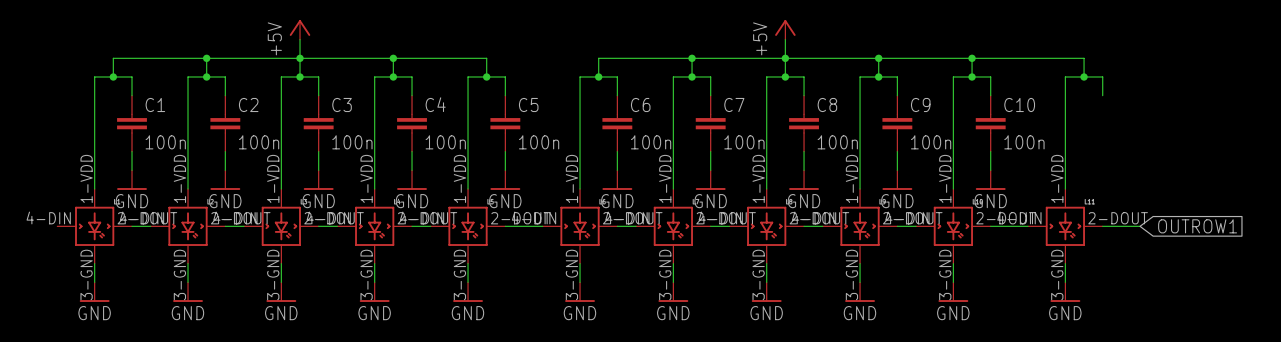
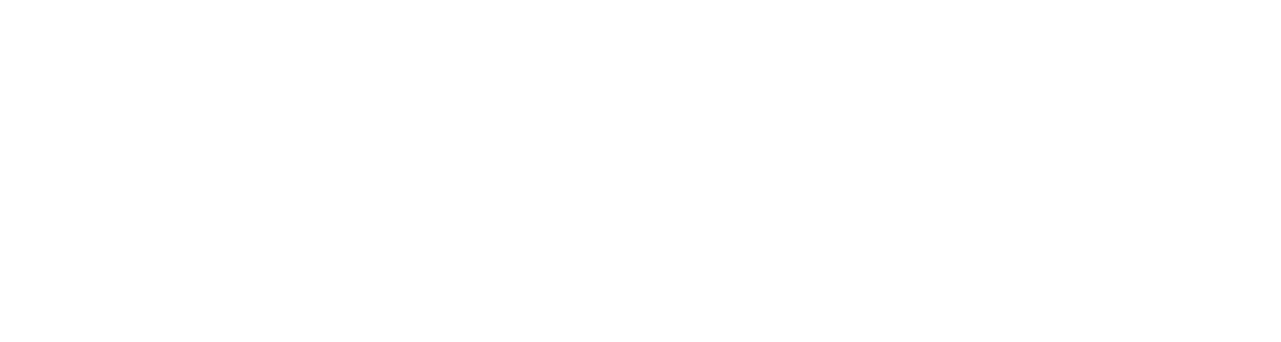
power symbol: +5V (300, 29) -> none
power symbol: +5V (785, 29) -> none
wire: (300, 39) (300, 76) -> none
wire: (785, 39) (785, 76) -> none
wire: (206, 58) (206, 76) -> none
junction: (206, 58) -> none
junction: (300, 58) -> none
wire: (393, 58) (393, 76) -> none
junction: (393, 58) -> none
wire: (692, 58) (692, 76) -> none
junction: (692, 58) -> none
junction: (785, 58) -> none
wire: (878, 58) (878, 76) -> none
junction: (878, 58) -> none
wire: (972, 58) (972, 76) -> none
junction: (972, 58) -> none
wire: (113, 76) (113, 58) (486, 58) (486, 76) -> none
junction: (113, 76) -> none
junction: (206, 76) -> none
junction: (300, 76) -> none
junction: (393, 76) -> none
junction: (486, 76) -> none
wire: (598, 76) (598, 58) (1084, 58) (1084, 76) -> none
junction: (598, 76) -> none
junction: (692, 76) -> none
junction: (785, 76) -> none
junction: (878, 76) -> none
junction: (972, 76) -> none
junction: (1084, 76) -> none
wire: (132, 95) (132, 76) (94, 76) (94, 189) -> none
wire: (225, 95) (225, 76) (188, 76) (188, 189) -> none
wire: (318, 95) (318, 76) (281, 76) (281, 189) -> none
wire: (412, 95) (412, 76) (374, 76) (374, 189) -> none
wire: (505, 95) (505, 76) (468, 76) (468, 189) -> none
wire: (617, 95) (617, 76) (580, 76) (580, 189) -> none
wire: (710, 95) (710, 76) (673, 76) (673, 189) -> none
wire: (804, 95) (804, 76) (766, 76) (766, 189) -> none
wire: (897, 95) (897, 76) (860, 76) (860, 189) -> none
wire: (990, 95) (990, 76) (953, 76) (953, 189) -> none
wire: (1102, 95) (1102, 76) (1065, 76) (1065, 189) -> none
C1: 100n (132, 123) -> none
C2: 100n (225, 123) -> none
C3: 100n (318, 123) -> none
C4: 100n (412, 123) -> none
C5: 100n (505, 123) -> none
C6: 100n (617, 123) -> none
C7: 100n (710, 123) -> none
C8: 100n (804, 123) -> none
C9: 100n (897, 123) -> none
C10: 100n (990, 123) -> none
wire: (132, 151) (132, 170) -> none
wire: (225, 151) (225, 170) -> none
wire: (318, 151) (318, 170) -> none
wire: (412, 151) (412, 170) -> none
wire: (505, 151) (505, 170) -> none
wire: (617, 151) (617, 170) -> none
wire: (710, 151) (710, 170) -> none
wire: (804, 151) (804, 170) -> none
wire: (897, 151) (897, 170) -> none
wire: (990, 151) (990, 170) -> none
power symbol: GND (132, 180) -> none
power symbol: GND (225, 180) -> none
power symbol: GND (318, 180) -> none
power symbol: GND (412, 180) -> none
power symbol: GND (505, 180) -> none
power symbol: GND (617, 180) -> none
power symbol: GND (710, 180) -> none
power symbol: GND (804, 180) -> none
power symbol: GND (897, 180) -> none
power symbol: GND (990, 180) -> none
part: (94, 226) -> none
wire: (132, 226) (150, 226) -> none
part: (188, 226) -> none
wire: (225, 226) (244, 226) -> none
part: (281, 226) -> none
wire: (318, 226) (337, 226) -> none
part: (374, 226) -> none
wire: (412, 226) (430, 226) -> none
part: (468, 226) -> none
wire: (505, 226) (542, 226) -> none
part: (580, 226) -> none
wire: (617, 226) (636, 226) -> none
part: (673, 226) -> none
wire: (710, 226) (729, 226) -> none
part: (766, 226) -> none
wire: (804, 226) (822, 226) -> none
part: (860, 226) -> none
wire: (897, 226) (916, 226) -> none
part: (953, 226) -> none
wire: (990, 226) (1028, 226) -> none
part: (1065, 226) -> none
wire: (1102, 226) (1140, 226) -> none
global label: OUTROW1 (1197, 226) -> none
wire: (94, 263) (94, 282) -> none
wire: (188, 263) (188, 282) -> none
wire: (281, 263) (281, 282) -> none
wire: (374, 263) (374, 282) -> none
wire: (468, 263) (468, 282) -> none
wire: (580, 263) (580, 282) -> none
wire: (673, 263) (673, 282) -> none
wire: (766, 263) (766, 282) -> none
wire: (860, 263) (860, 282) -> none
wire: (953, 263) (953, 282) -> none
wire: (1065, 263) (1065, 282) -> none
power symbol: GND (94, 292) -> none
power symbol: GND (188, 292) -> none
power symbol: GND (281, 292) -> none
power symbol: GND (374, 292) -> none
power symbol: GND (468, 292) -> none
power symbol: GND (580, 292) -> none
power symbol: GND (673, 292) -> none
power symbol: GND (766, 292) -> none
power symbol: GND (860, 292) -> none
power symbol: GND (953, 292) -> none
power symbol: GND (1065, 292) -> none

